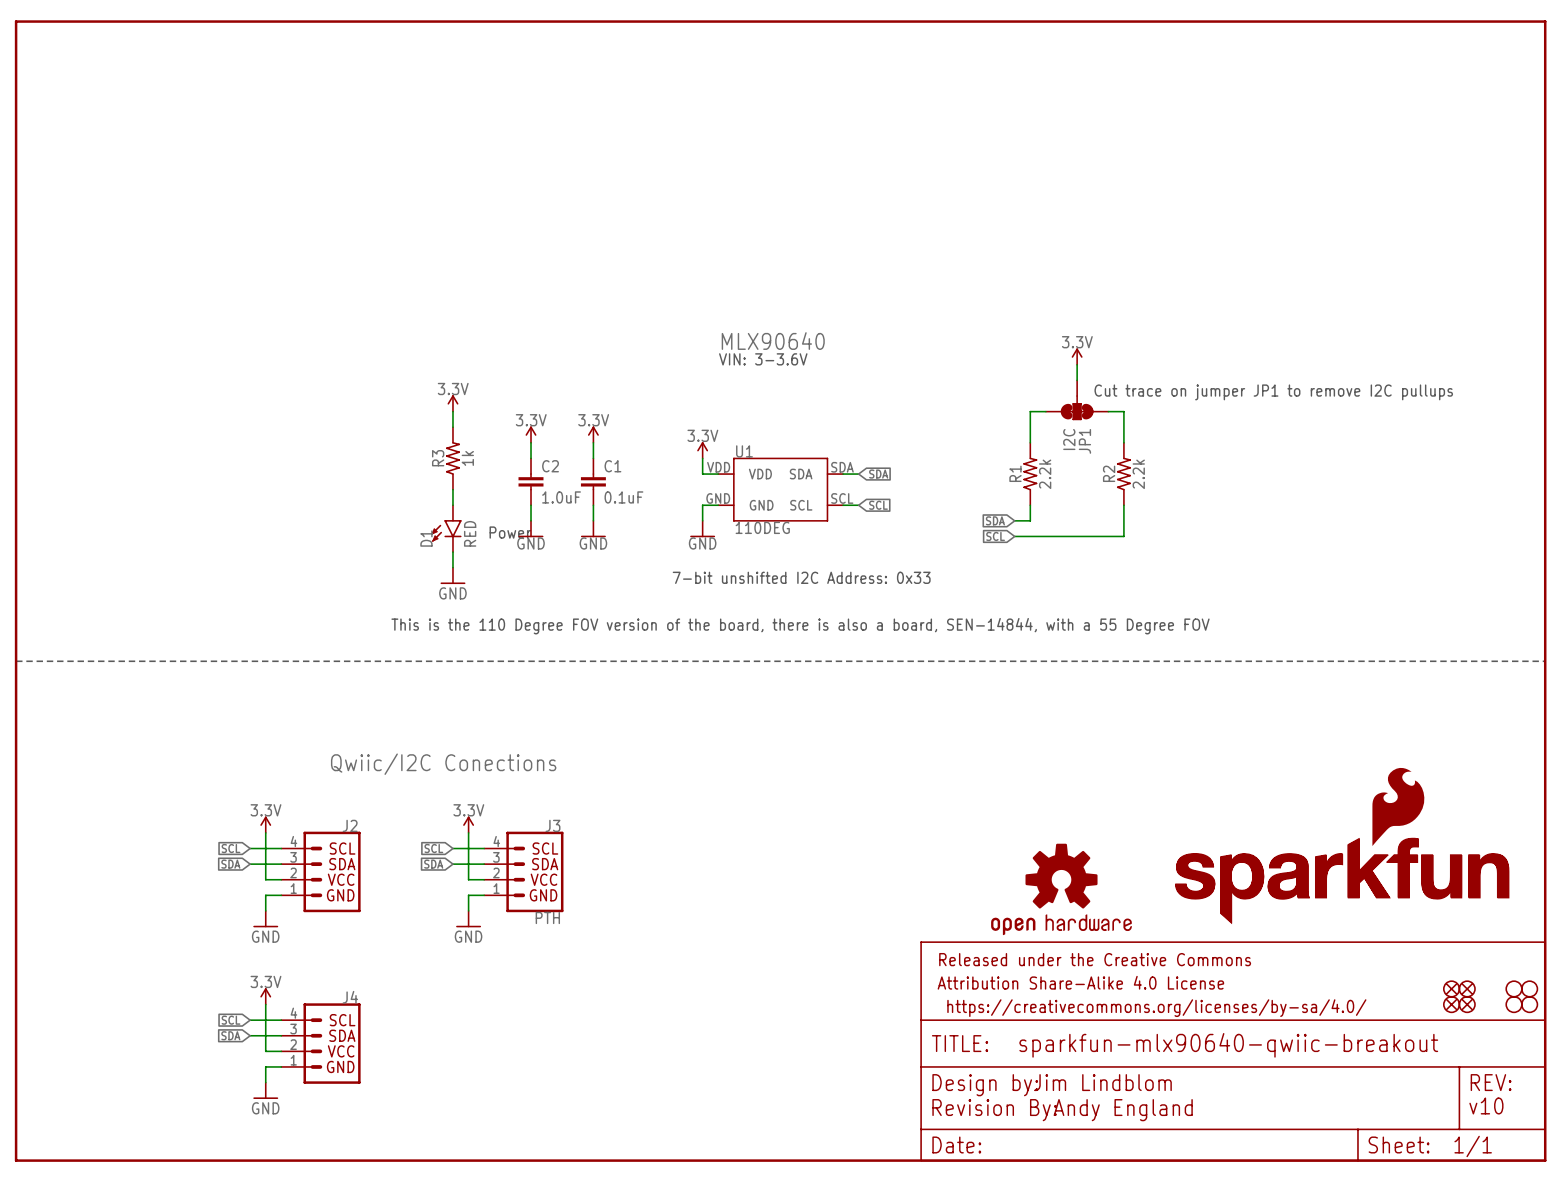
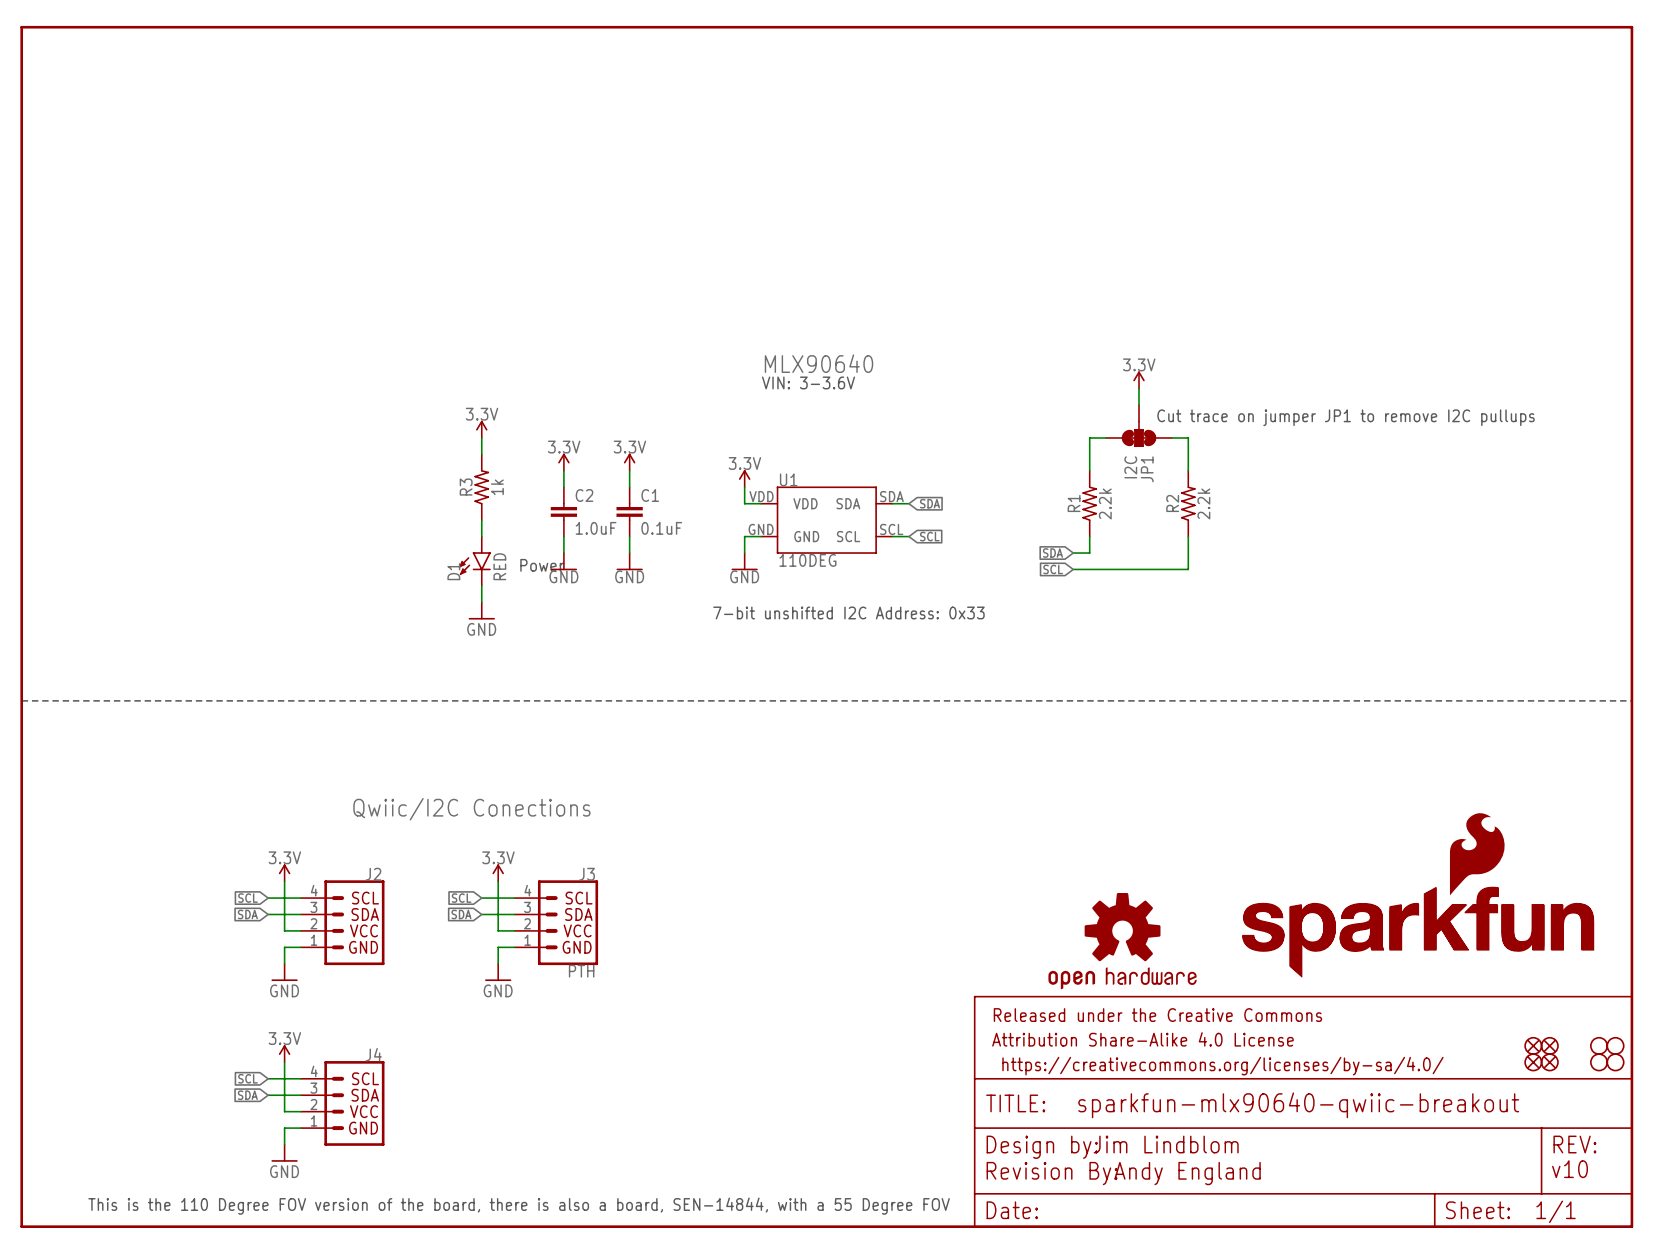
text: This is the 110 Degree FOV version of the board, there is also a board, SEN-14844, with a 55 Degree FOV (800, 626) -> none
text: none -> This is the 110 Degree FOV version of the board, there is also a board, SEN-14844, with a 55 Degree FOV (519, 1206)

